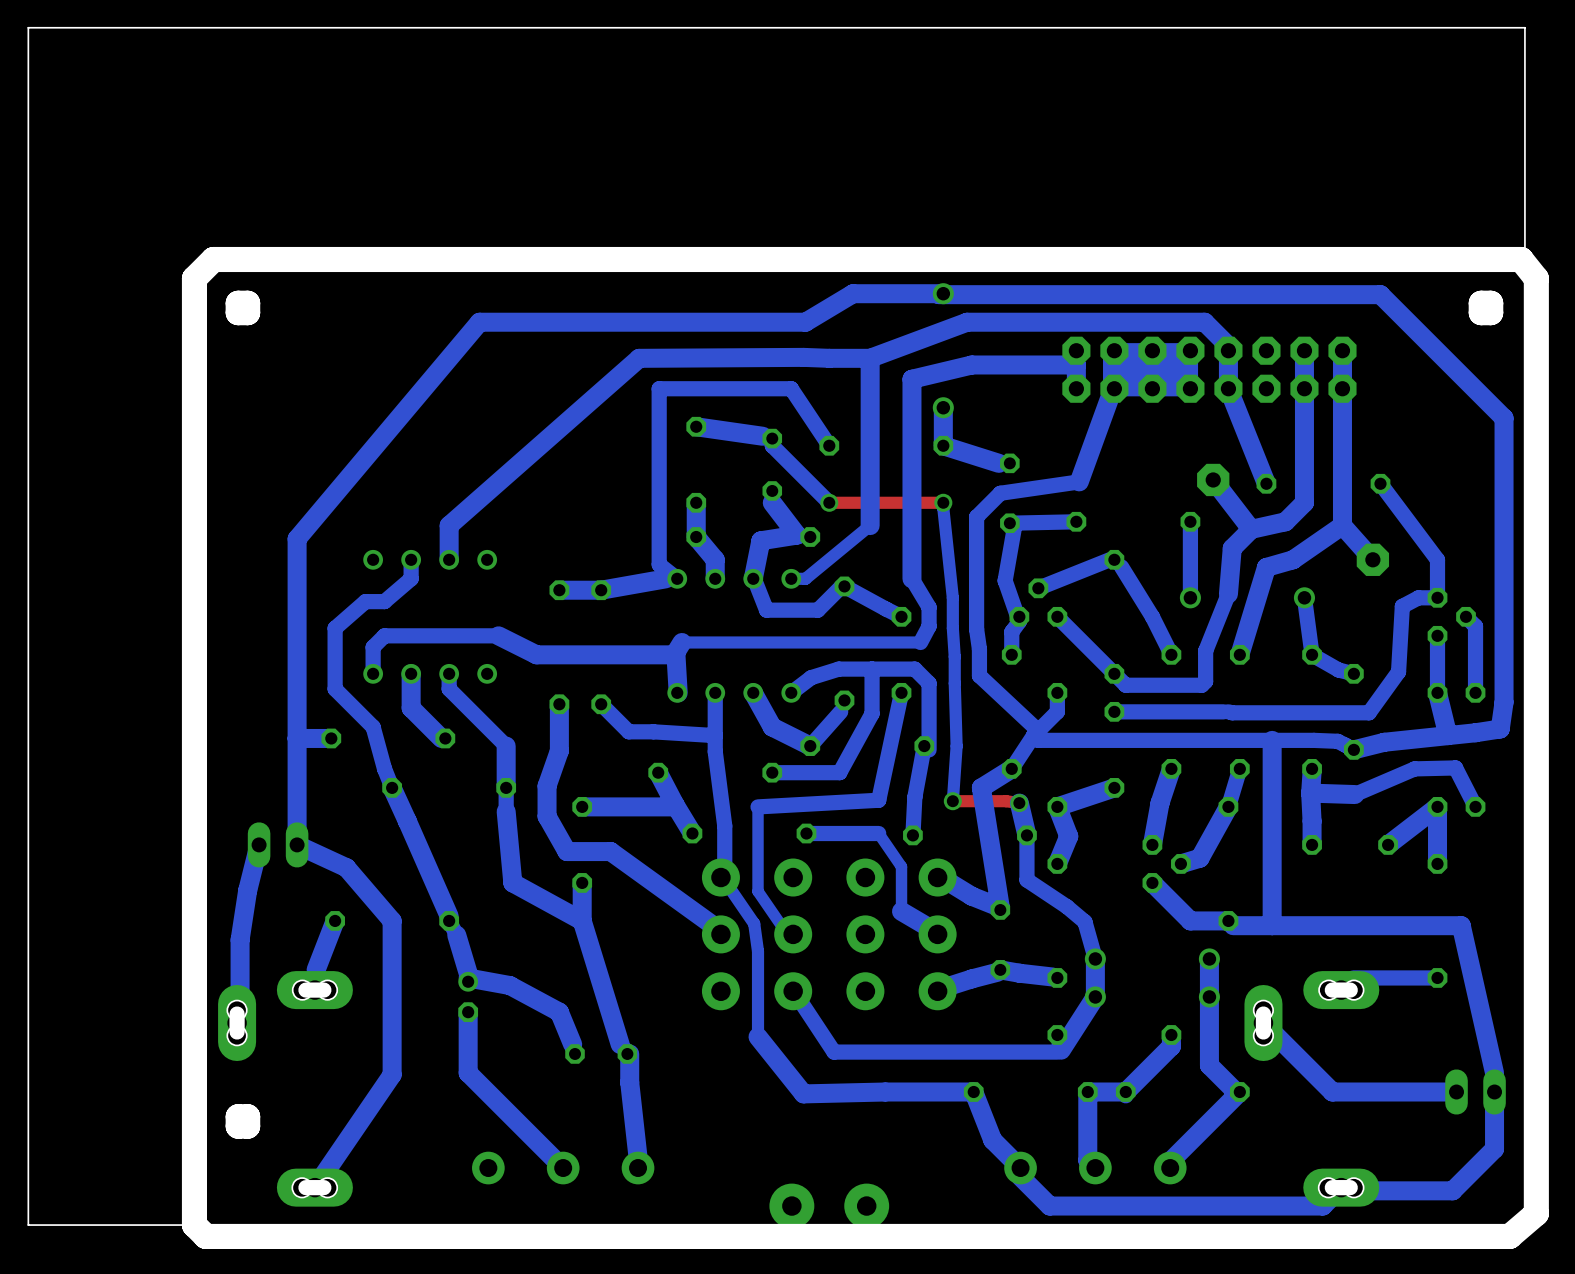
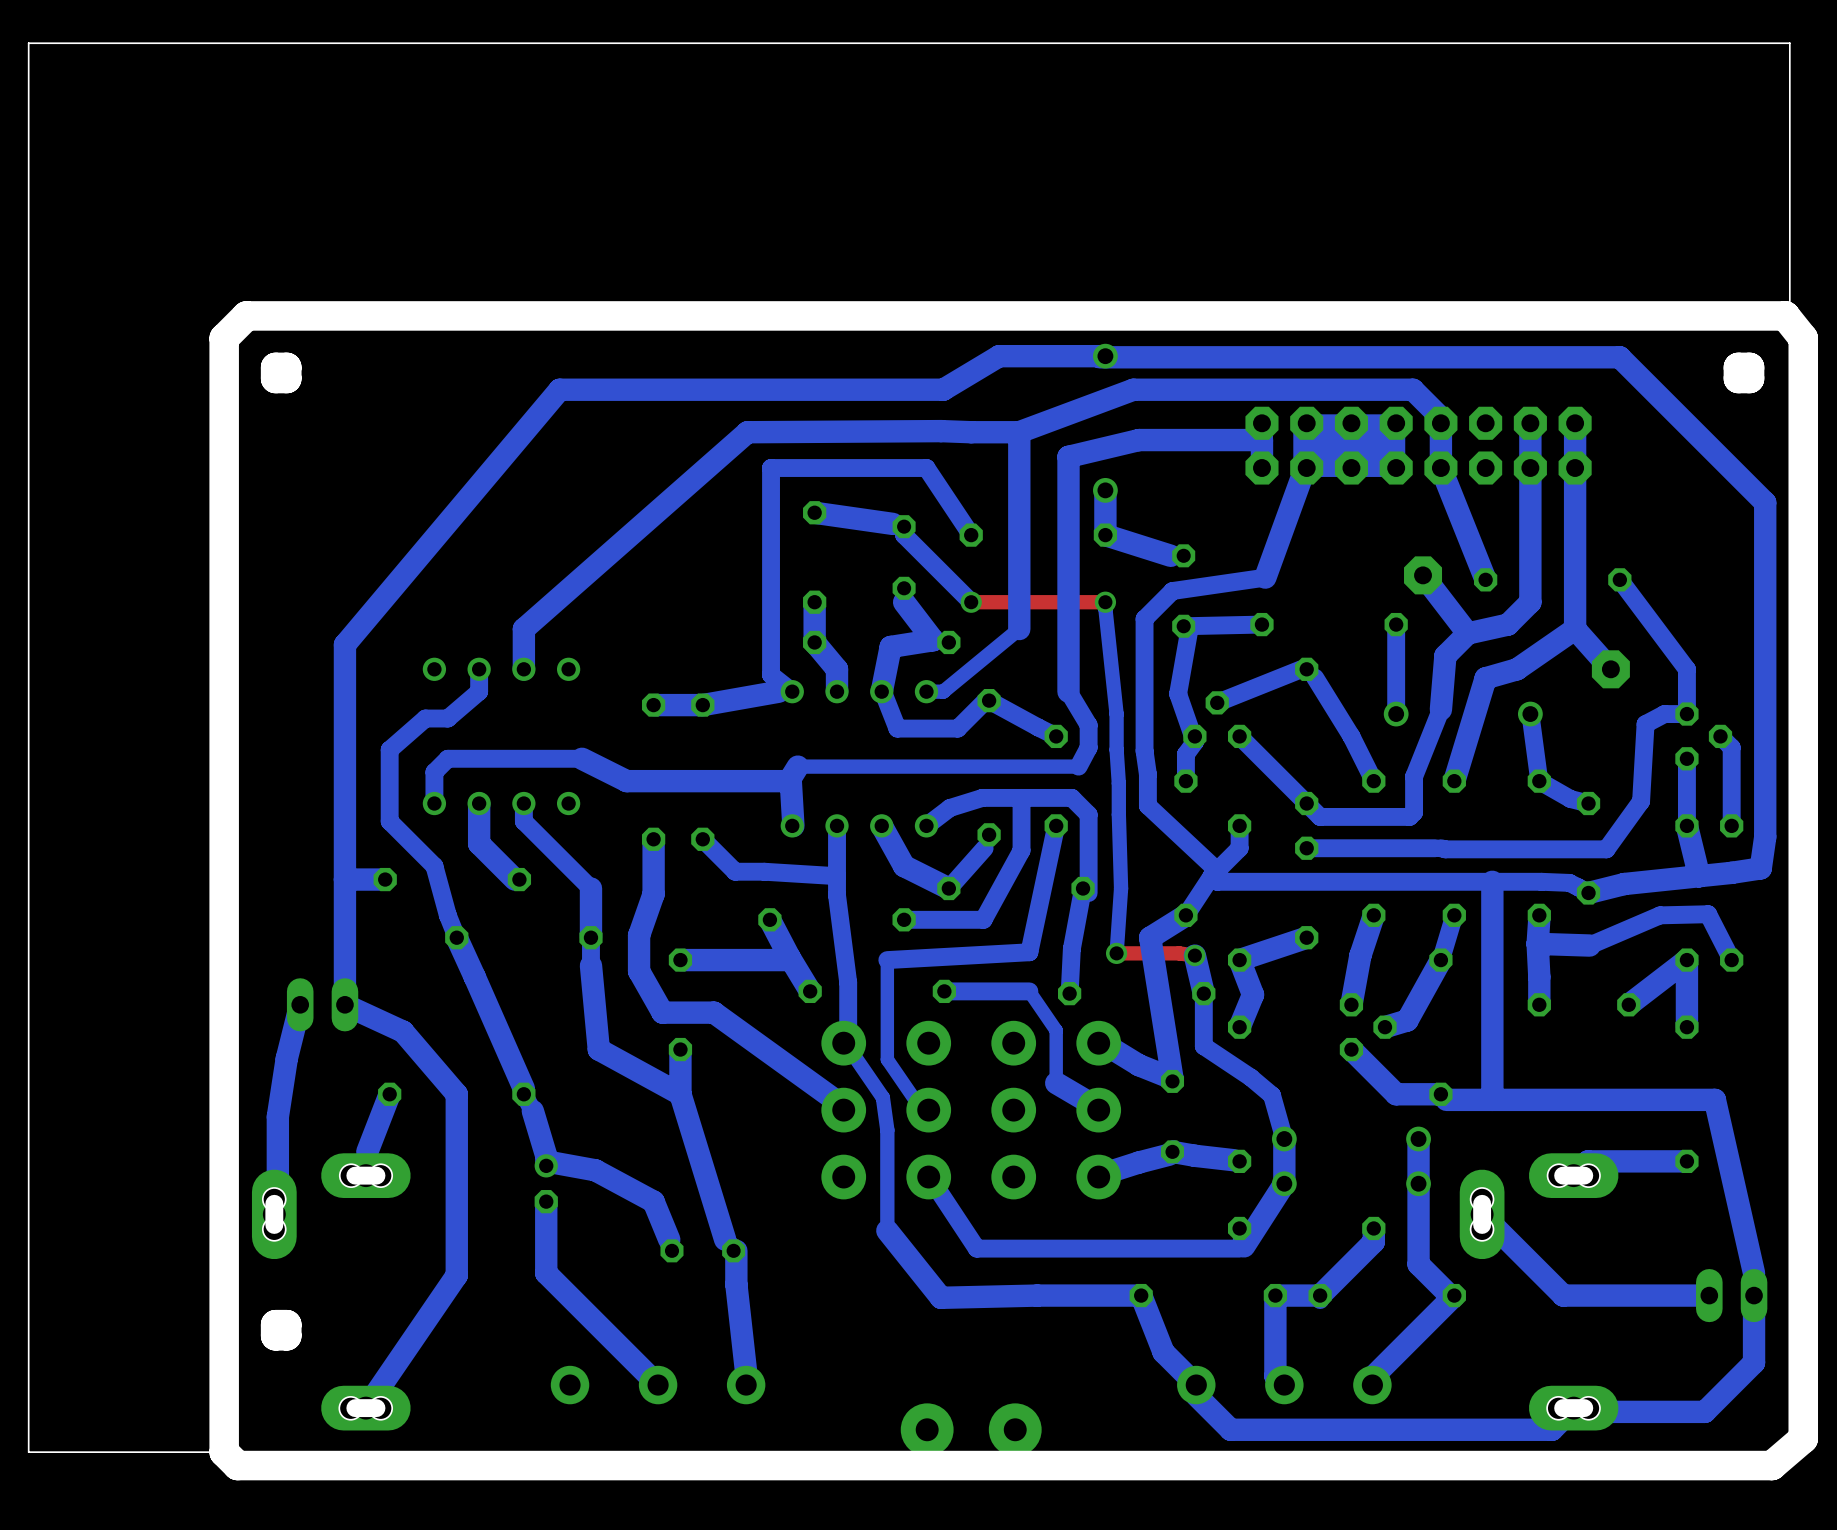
bottom track width: thin (1437, 977) (1353, 977) (1341, 990) -> thick (1686, 1161) (1587, 1161) (1573, 1175)

